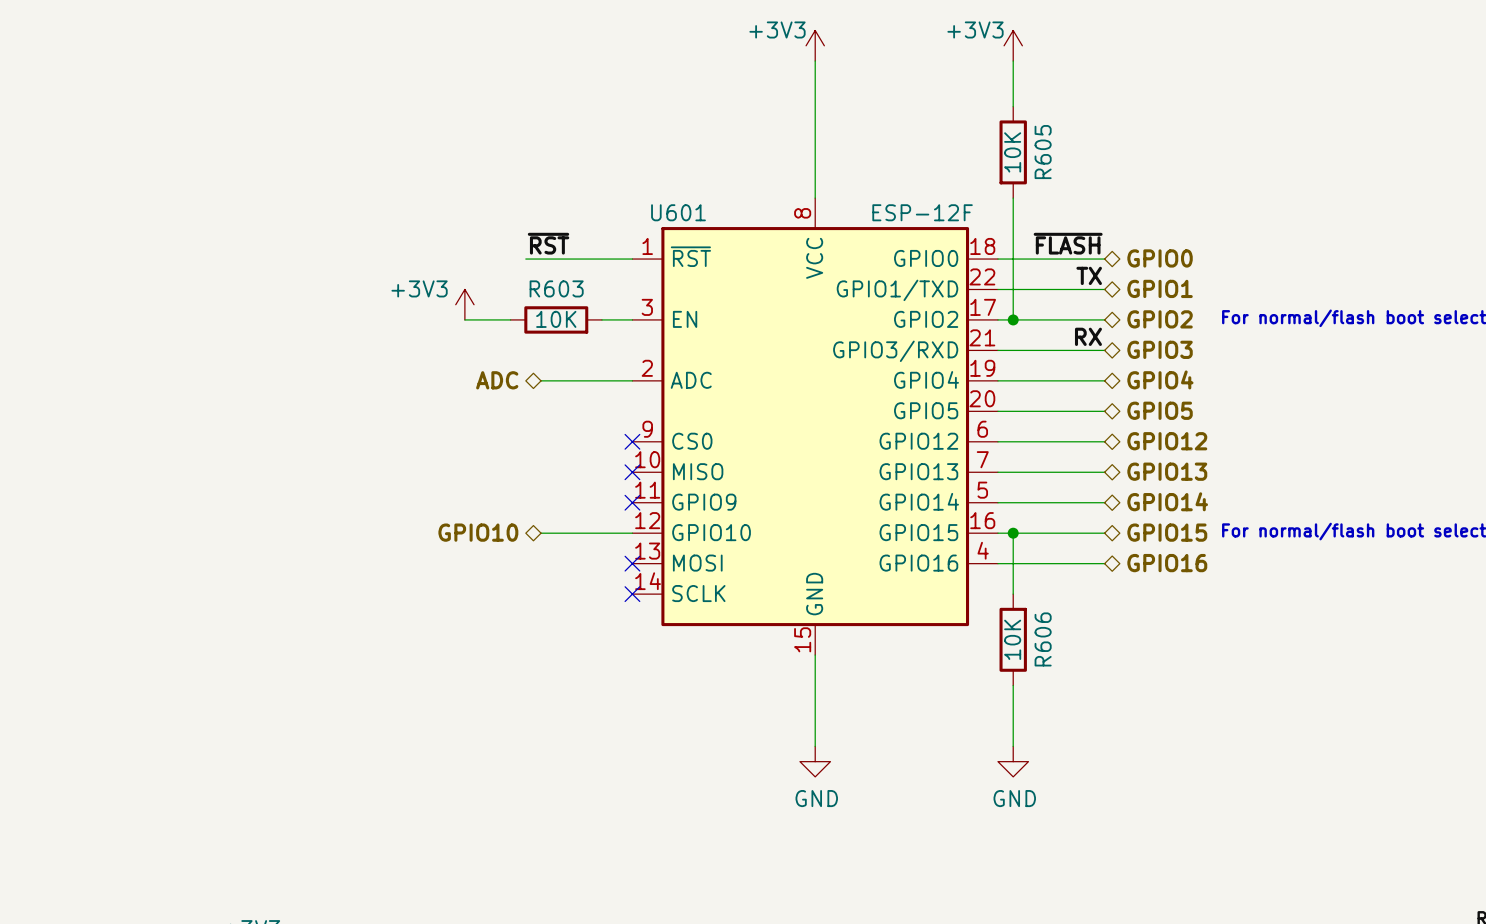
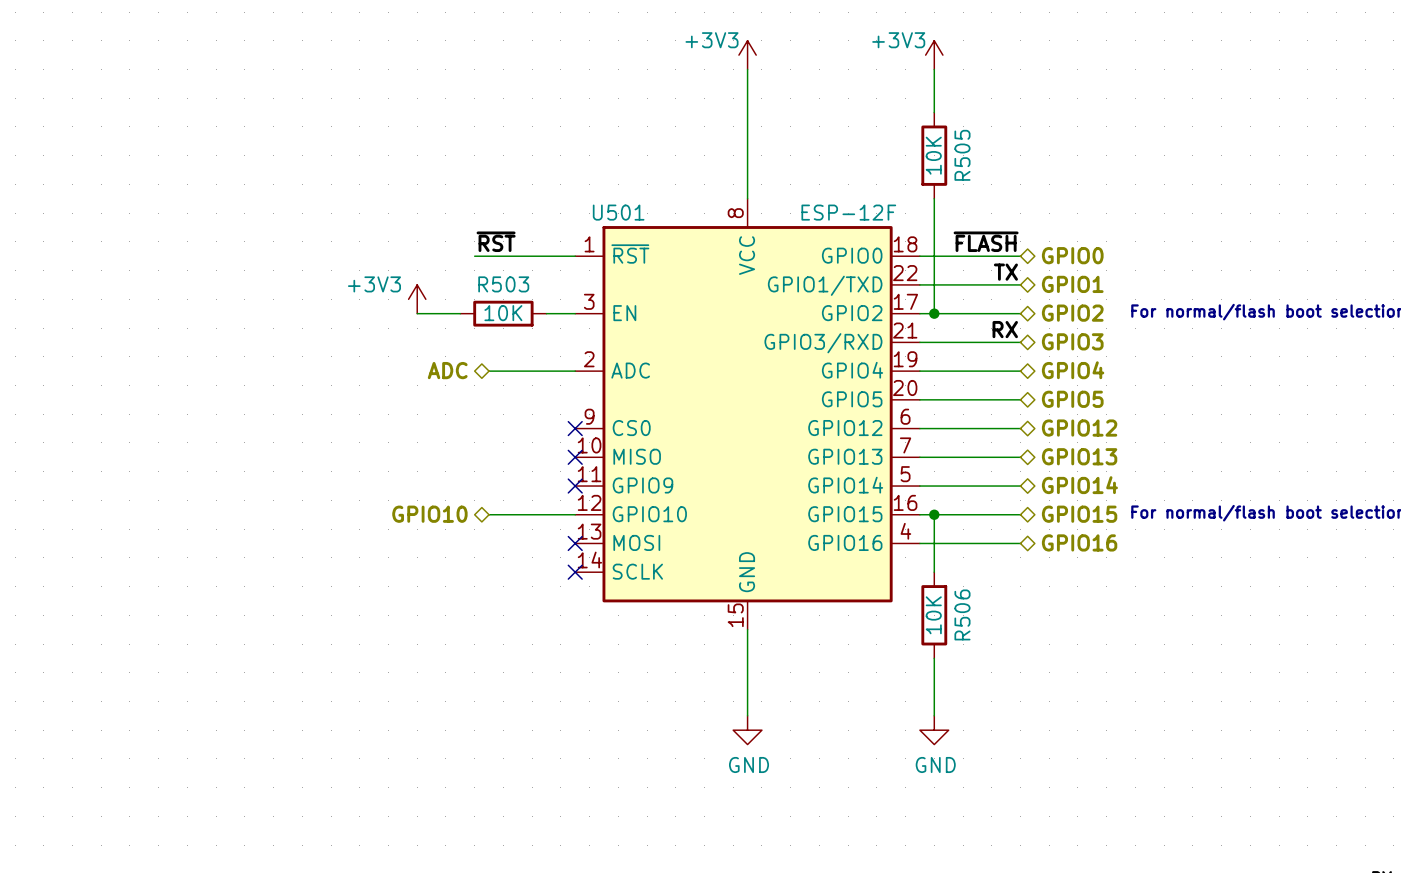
R605 name: R605 (1043, 152) -> R505 (962, 155)
U601 name: U601 (678, 212) -> U501 (618, 212)
R603 name: R603 (556, 288) -> R503 (503, 284)
R606 name: R606 (1043, 639) -> R506 (962, 614)

